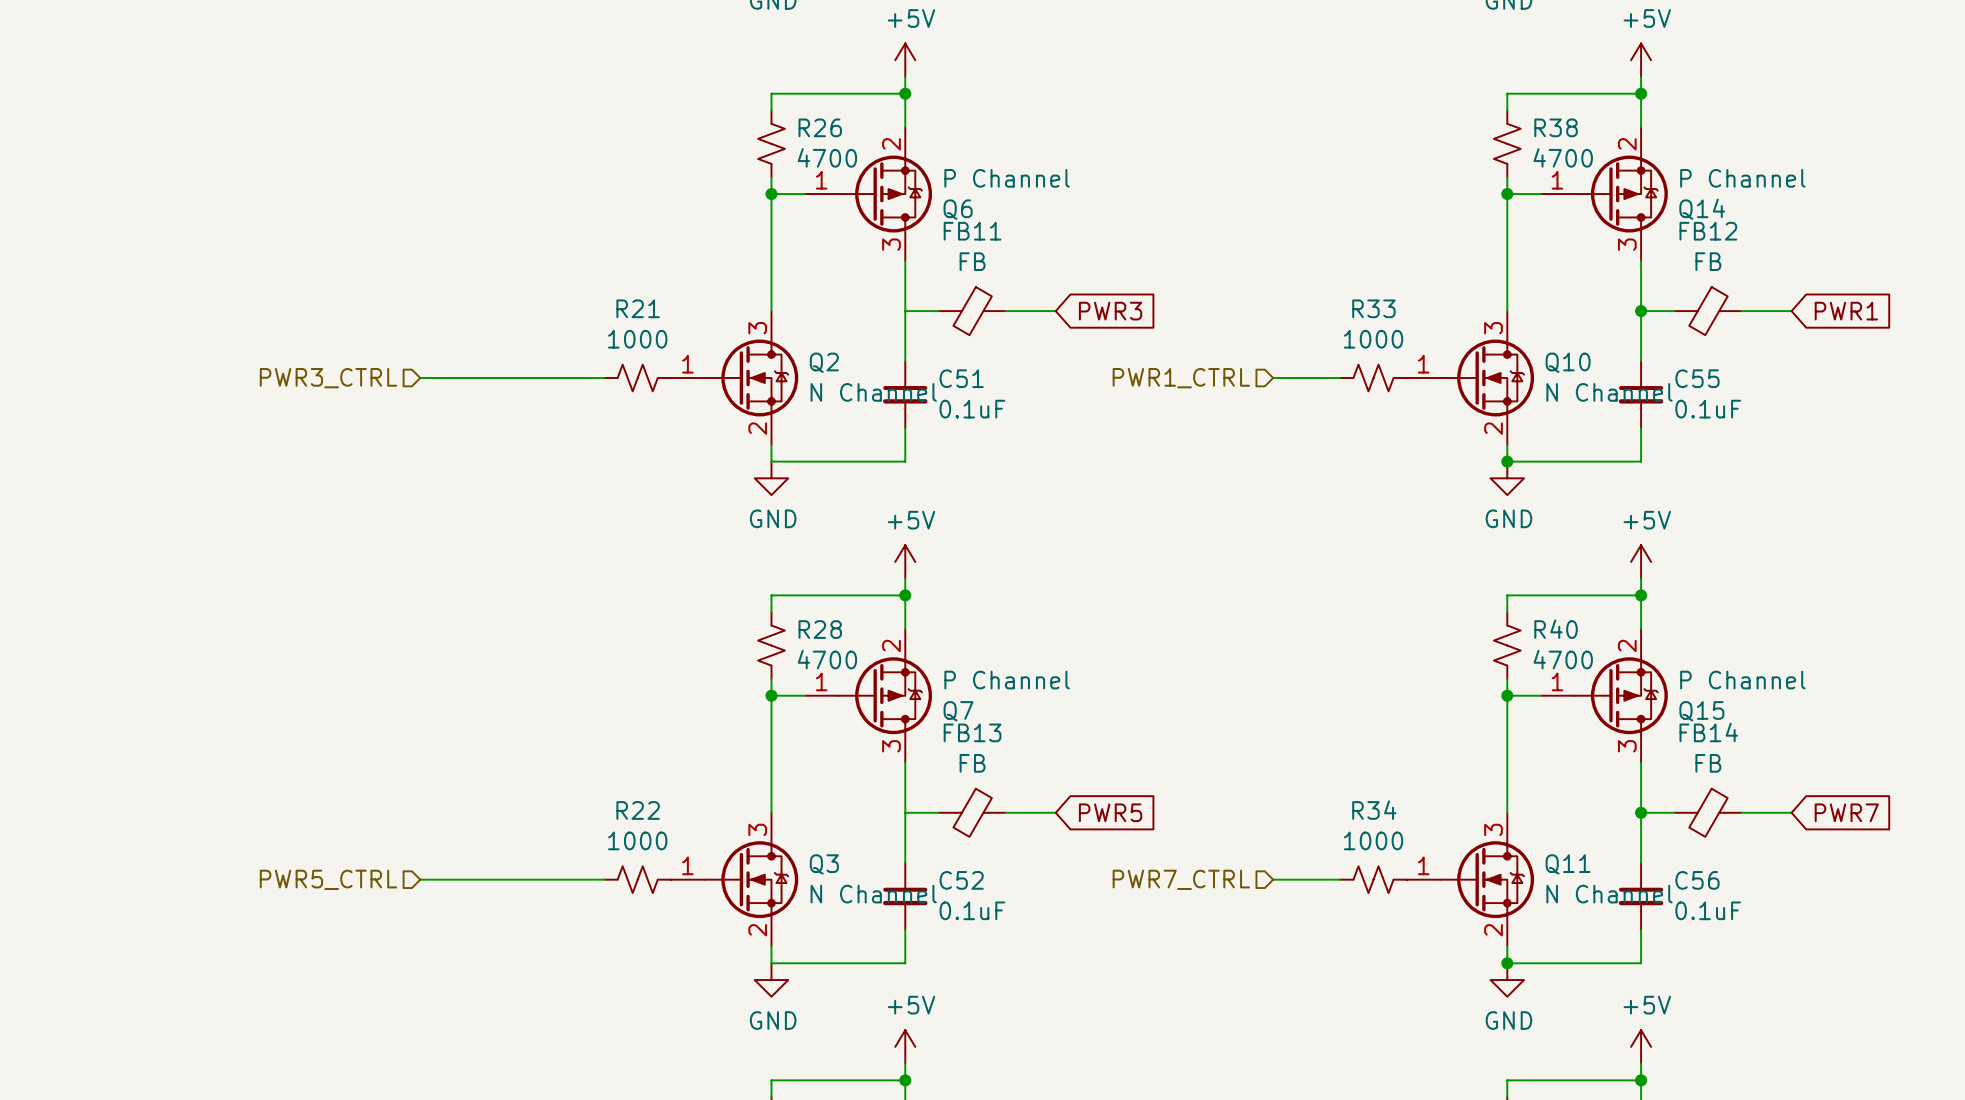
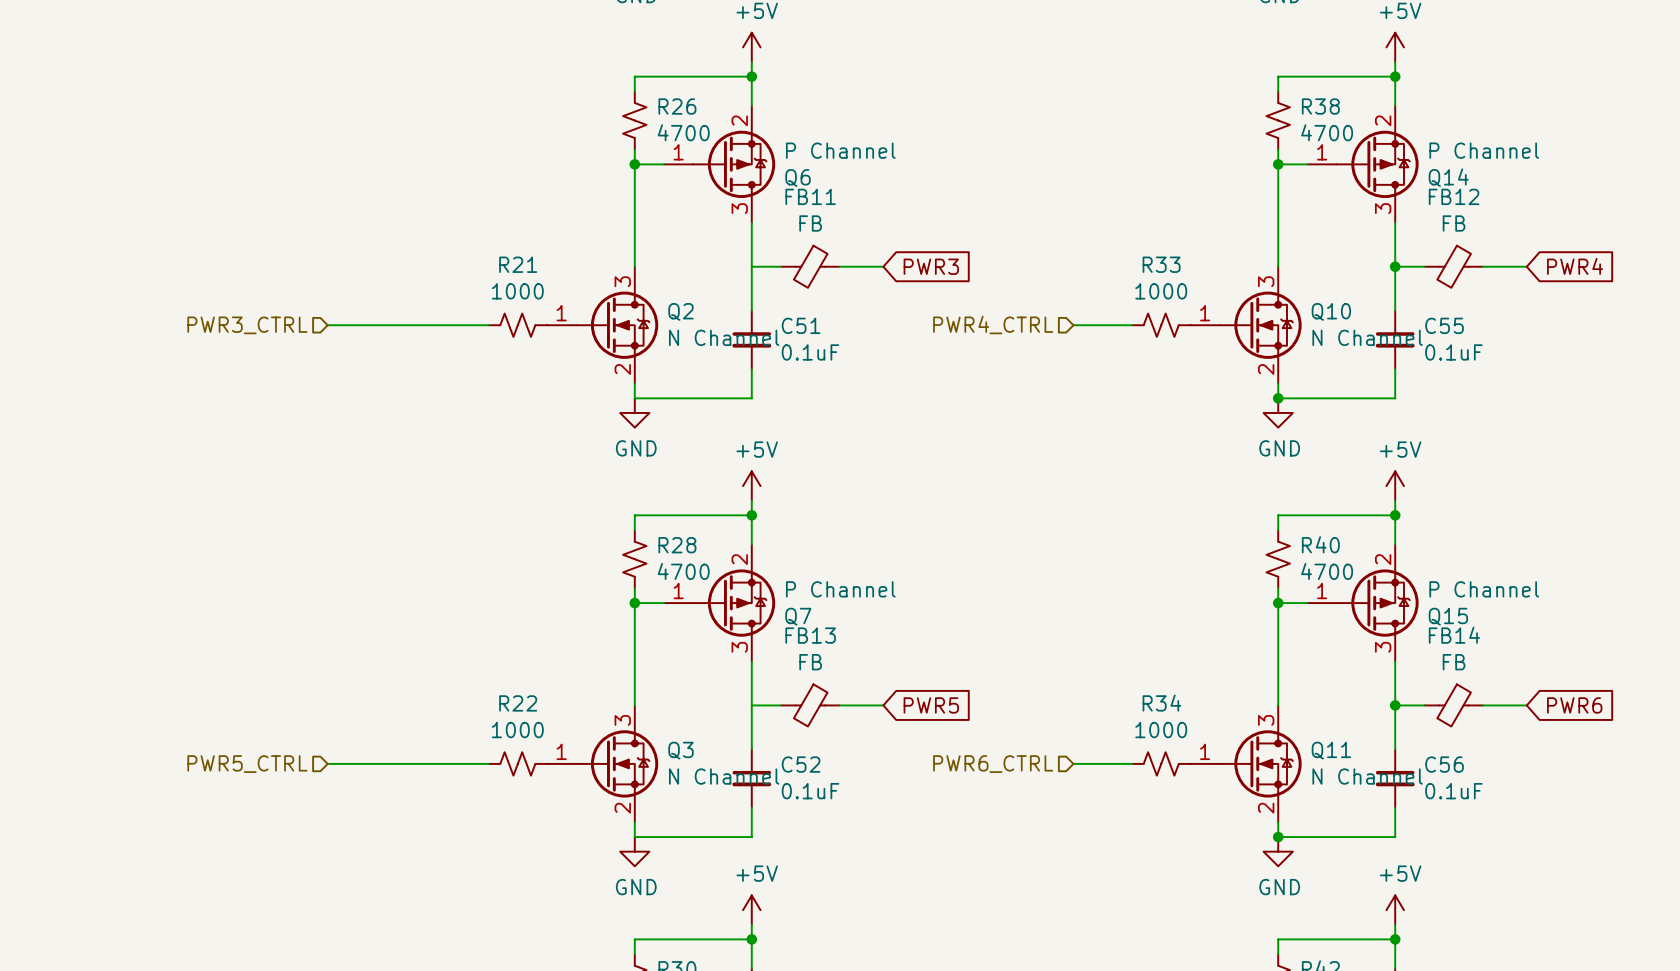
global label: PWR1 (1846, 311) -> PWR4 (1575, 266)
hierarchical label: PWR1_CTRL (1181, 378) -> PWR4_CTRL (993, 325)
global label: PWR7 (1846, 812) -> PWR6 (1574, 705)
hierarchical label: PWR7_CTRL (1181, 879) -> PWR6_CTRL (993, 764)

